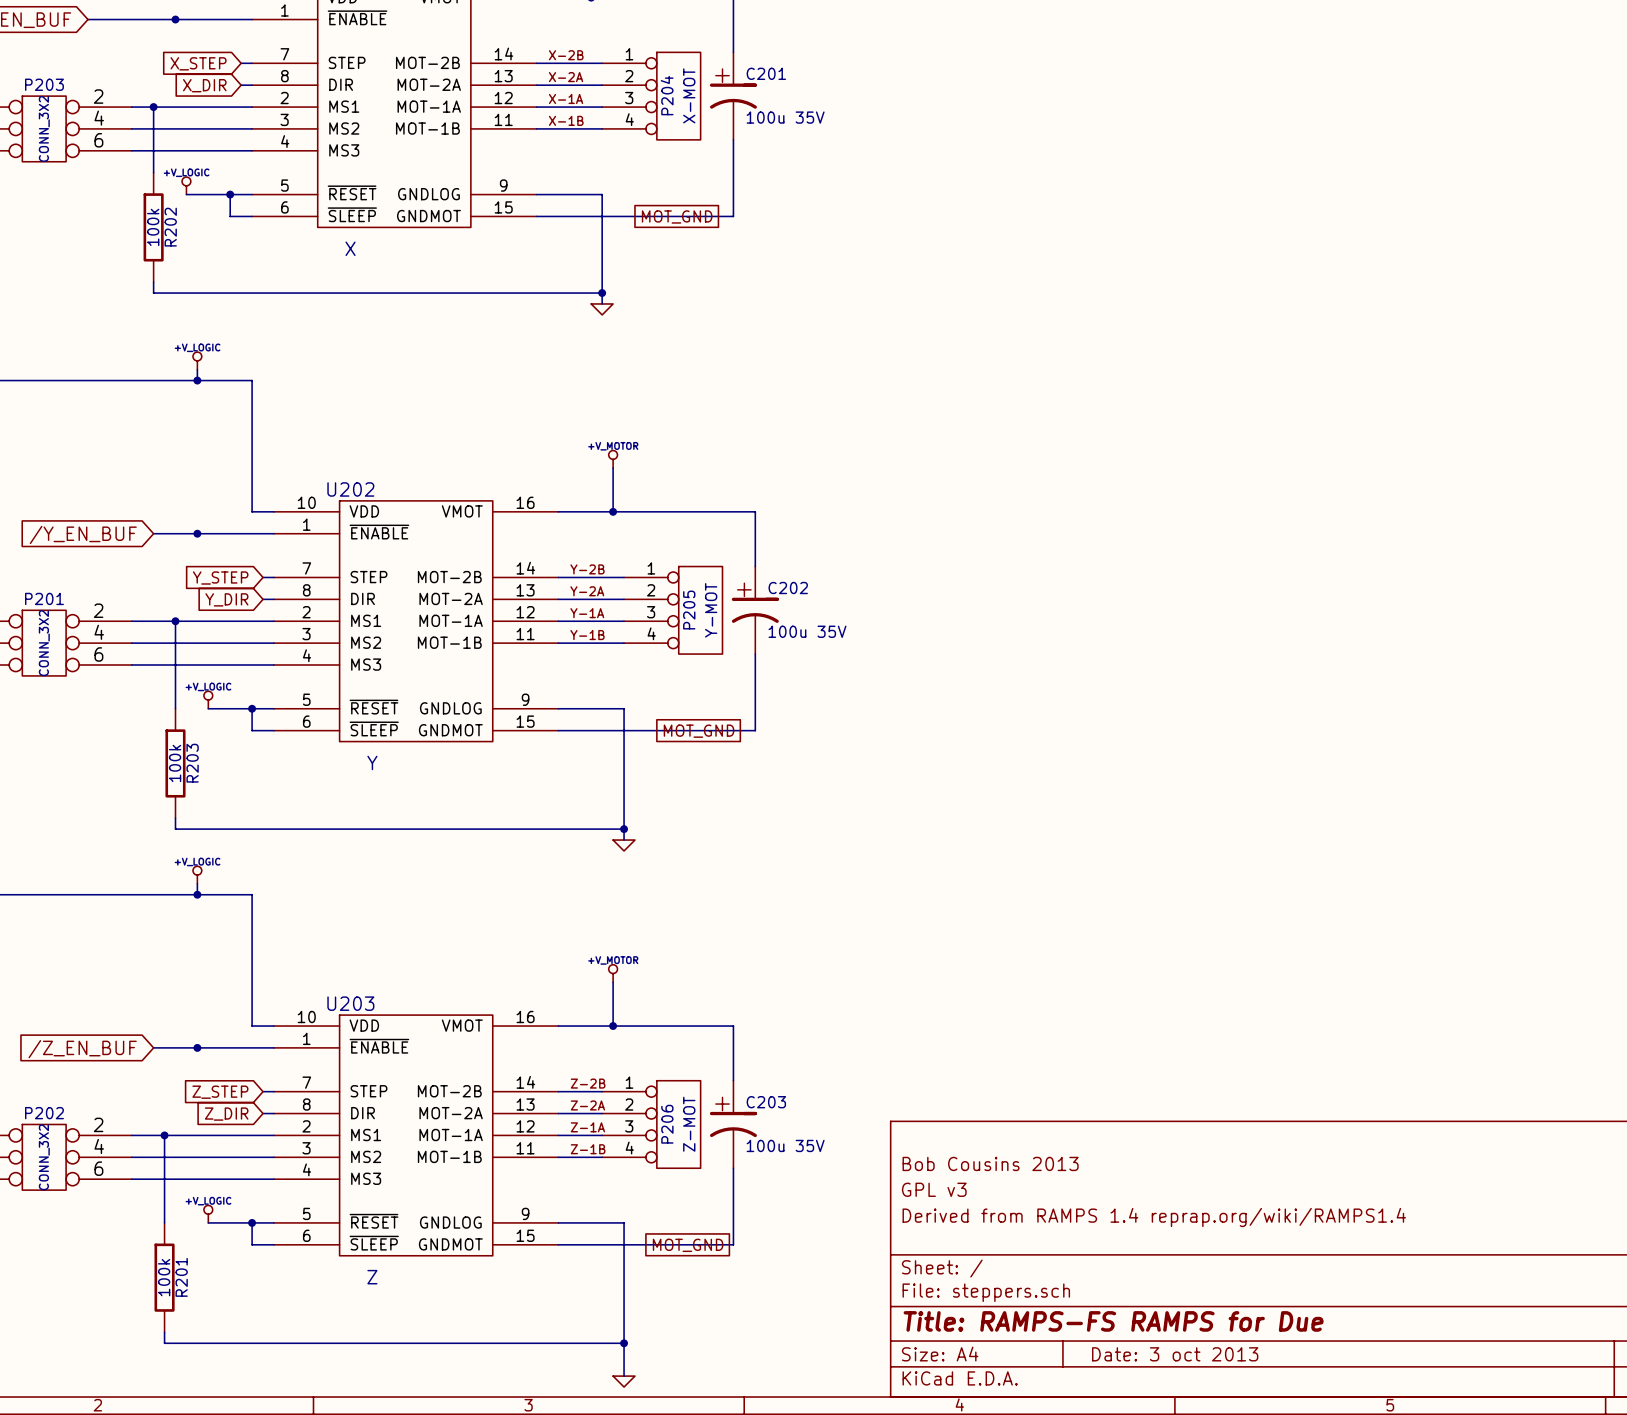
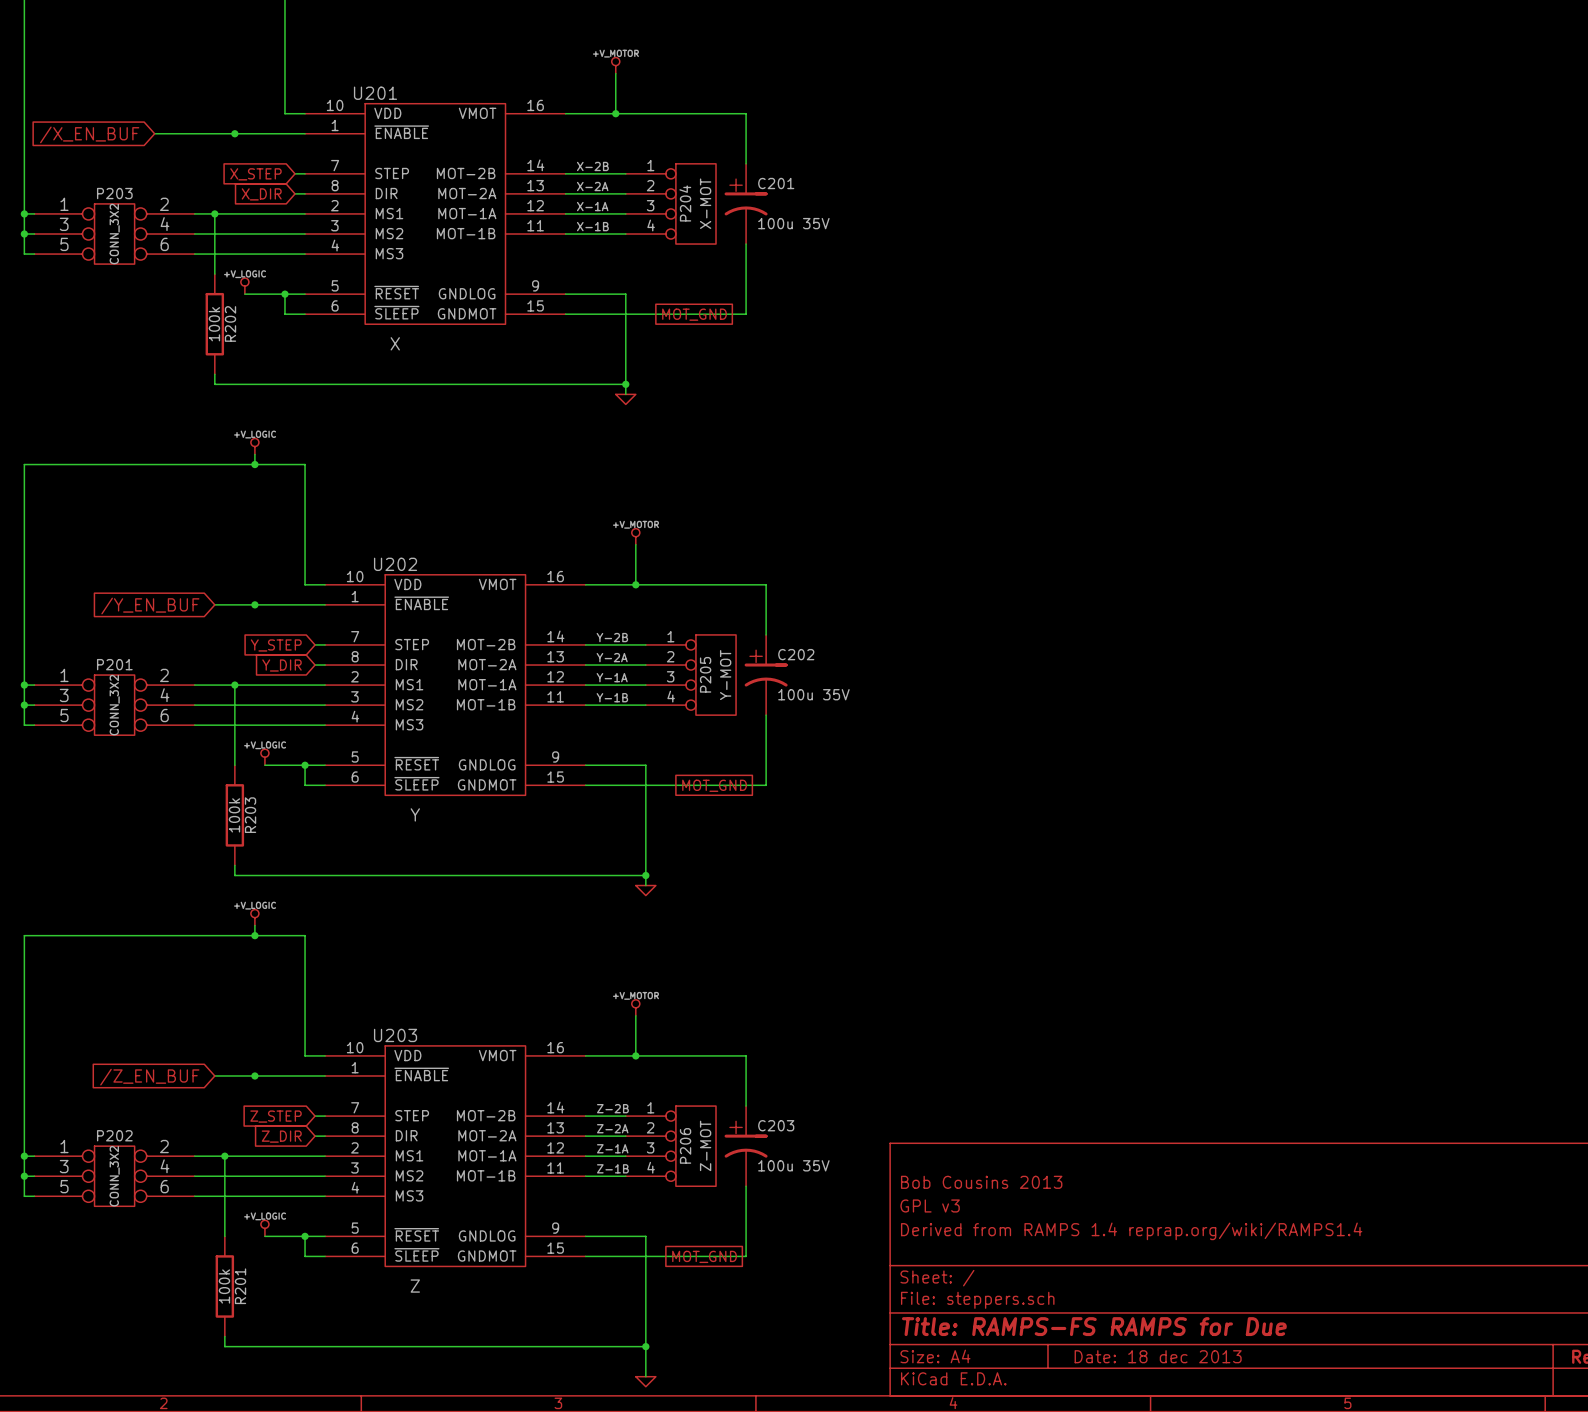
title block: Date: 3 oct 2013 (1175, 1354) -> Date: 18 dec 2013 (1158, 1356)

